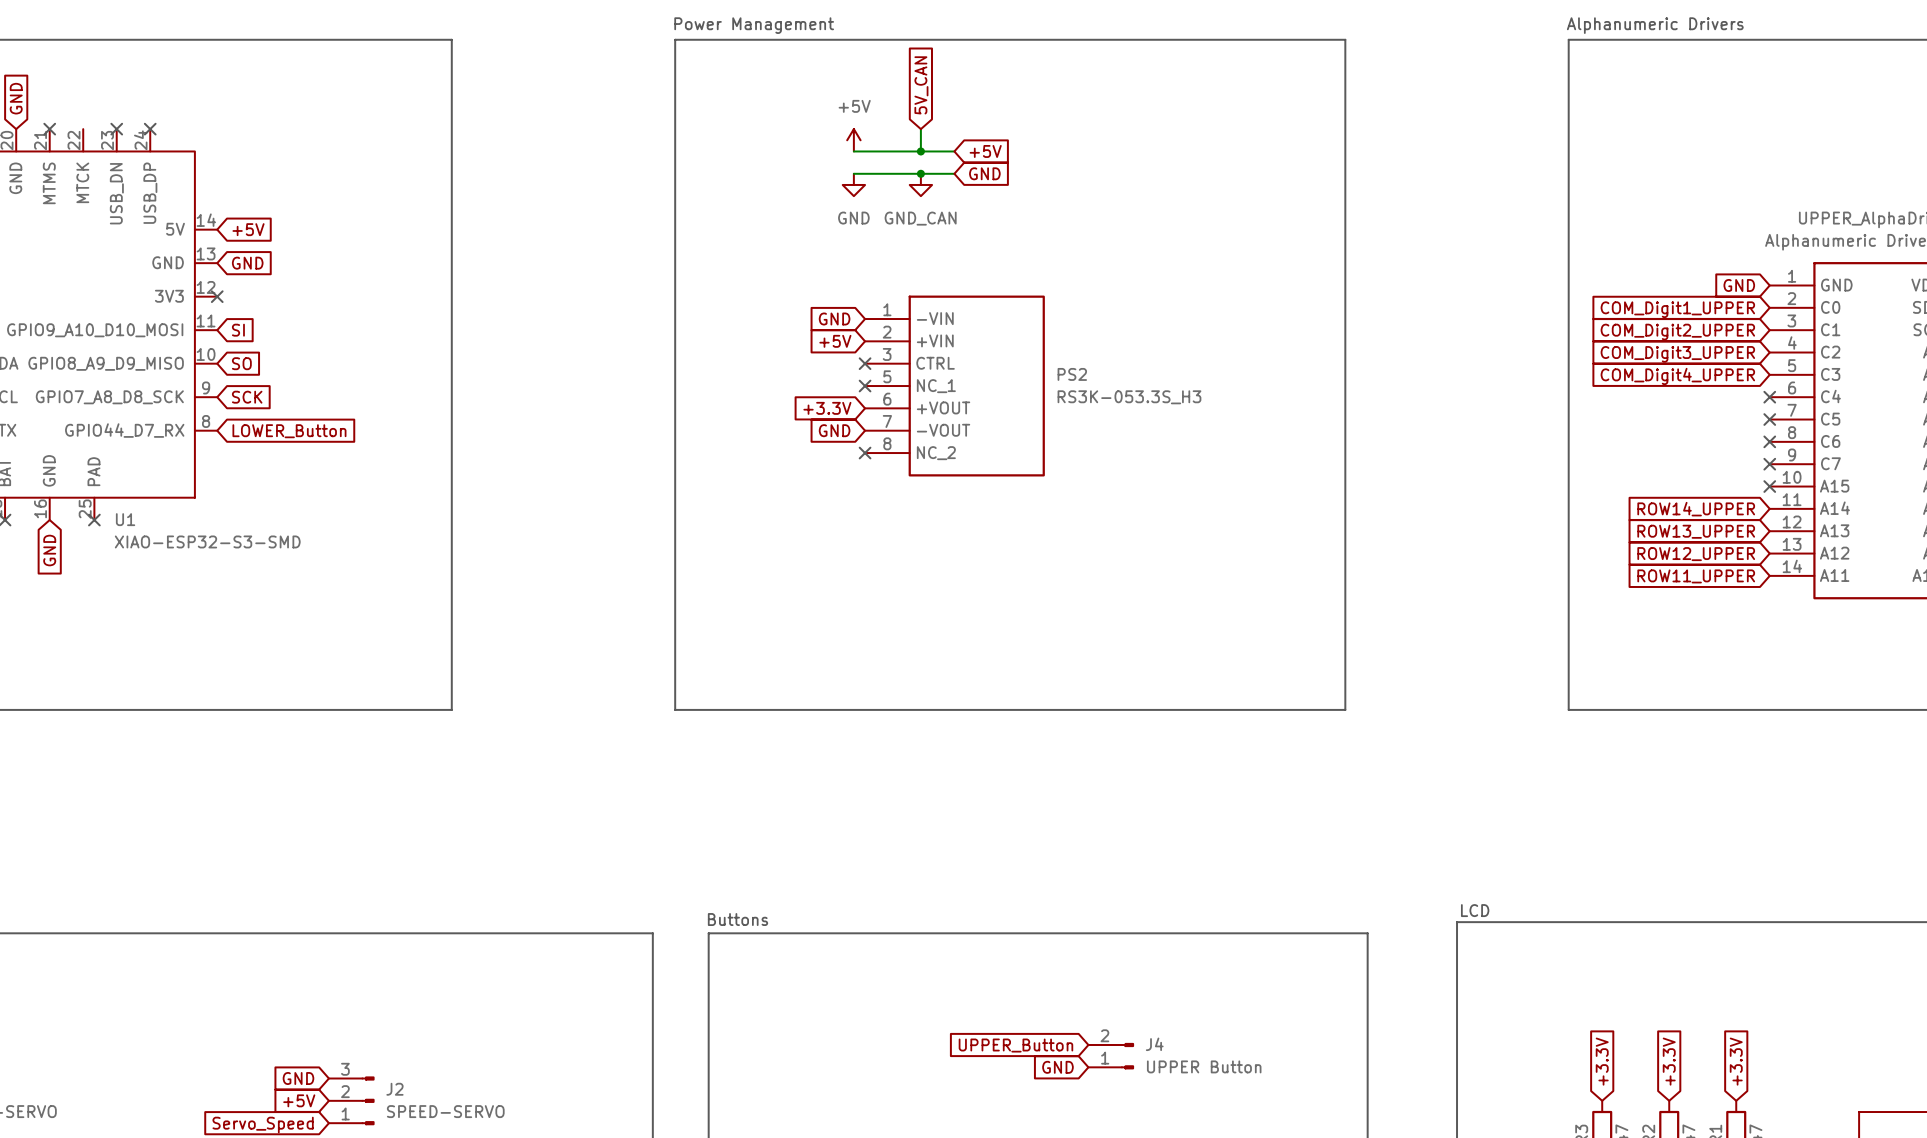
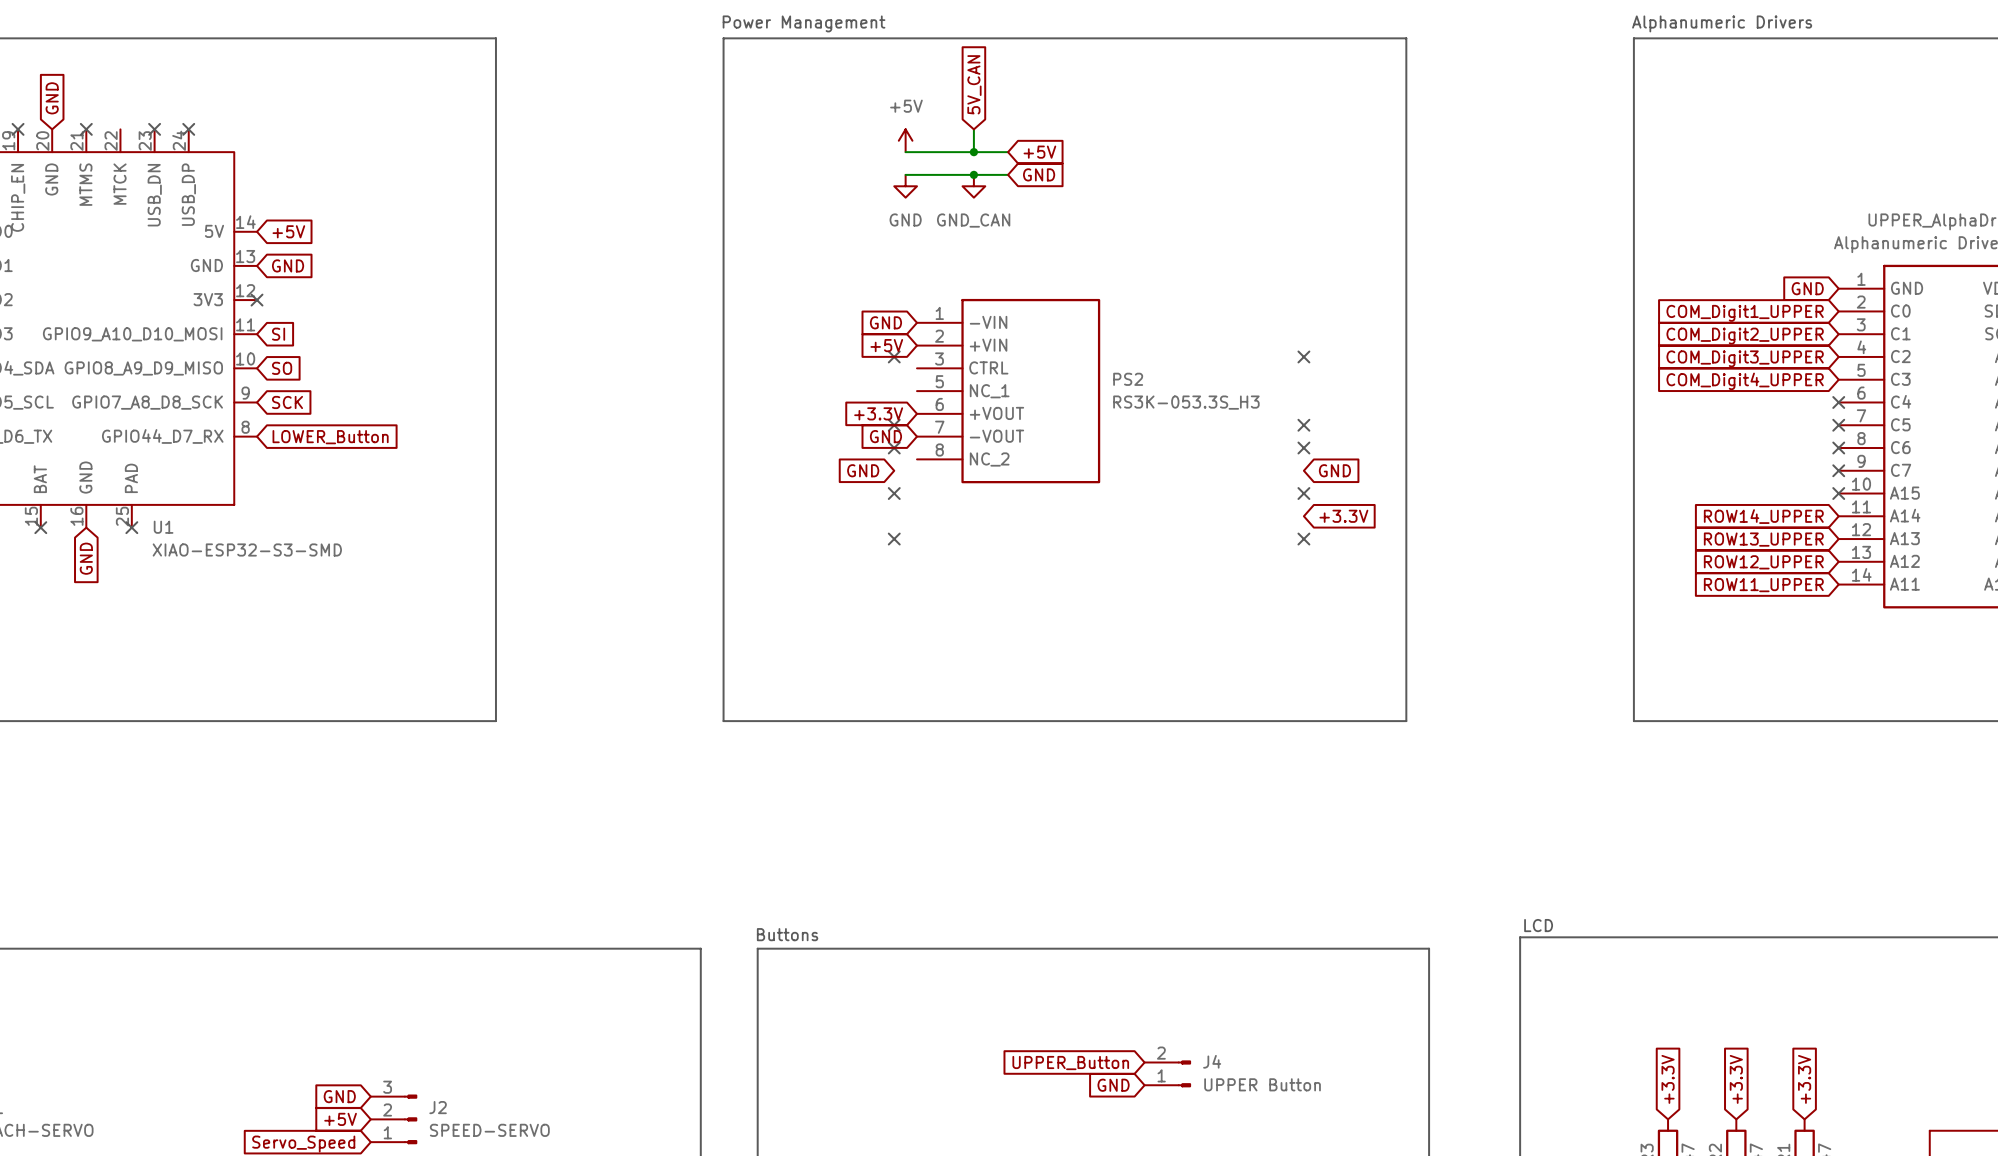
no-connect mark: none -> (894, 356)
no-connect mark: none -> (1303, 356)
no-connect mark: (865, 363) -> none
no-connect mark: (865, 386) -> none
no-connect mark: none -> (894, 425)
no-connect mark: none -> (1303, 425)
no-connect mark: none -> (894, 448)
no-connect mark: none -> (1303, 448)
no-connect mark: (865, 453) -> none
global label: none -> GND (863, 470)
global label: none -> GND (1334, 470)
no-connect mark: none -> (894, 493)
no-connect mark: none -> (1303, 493)
global label: none -> +3.3V (1343, 516)
no-connect mark: none -> (894, 539)
no-connect mark: none -> (1303, 539)

